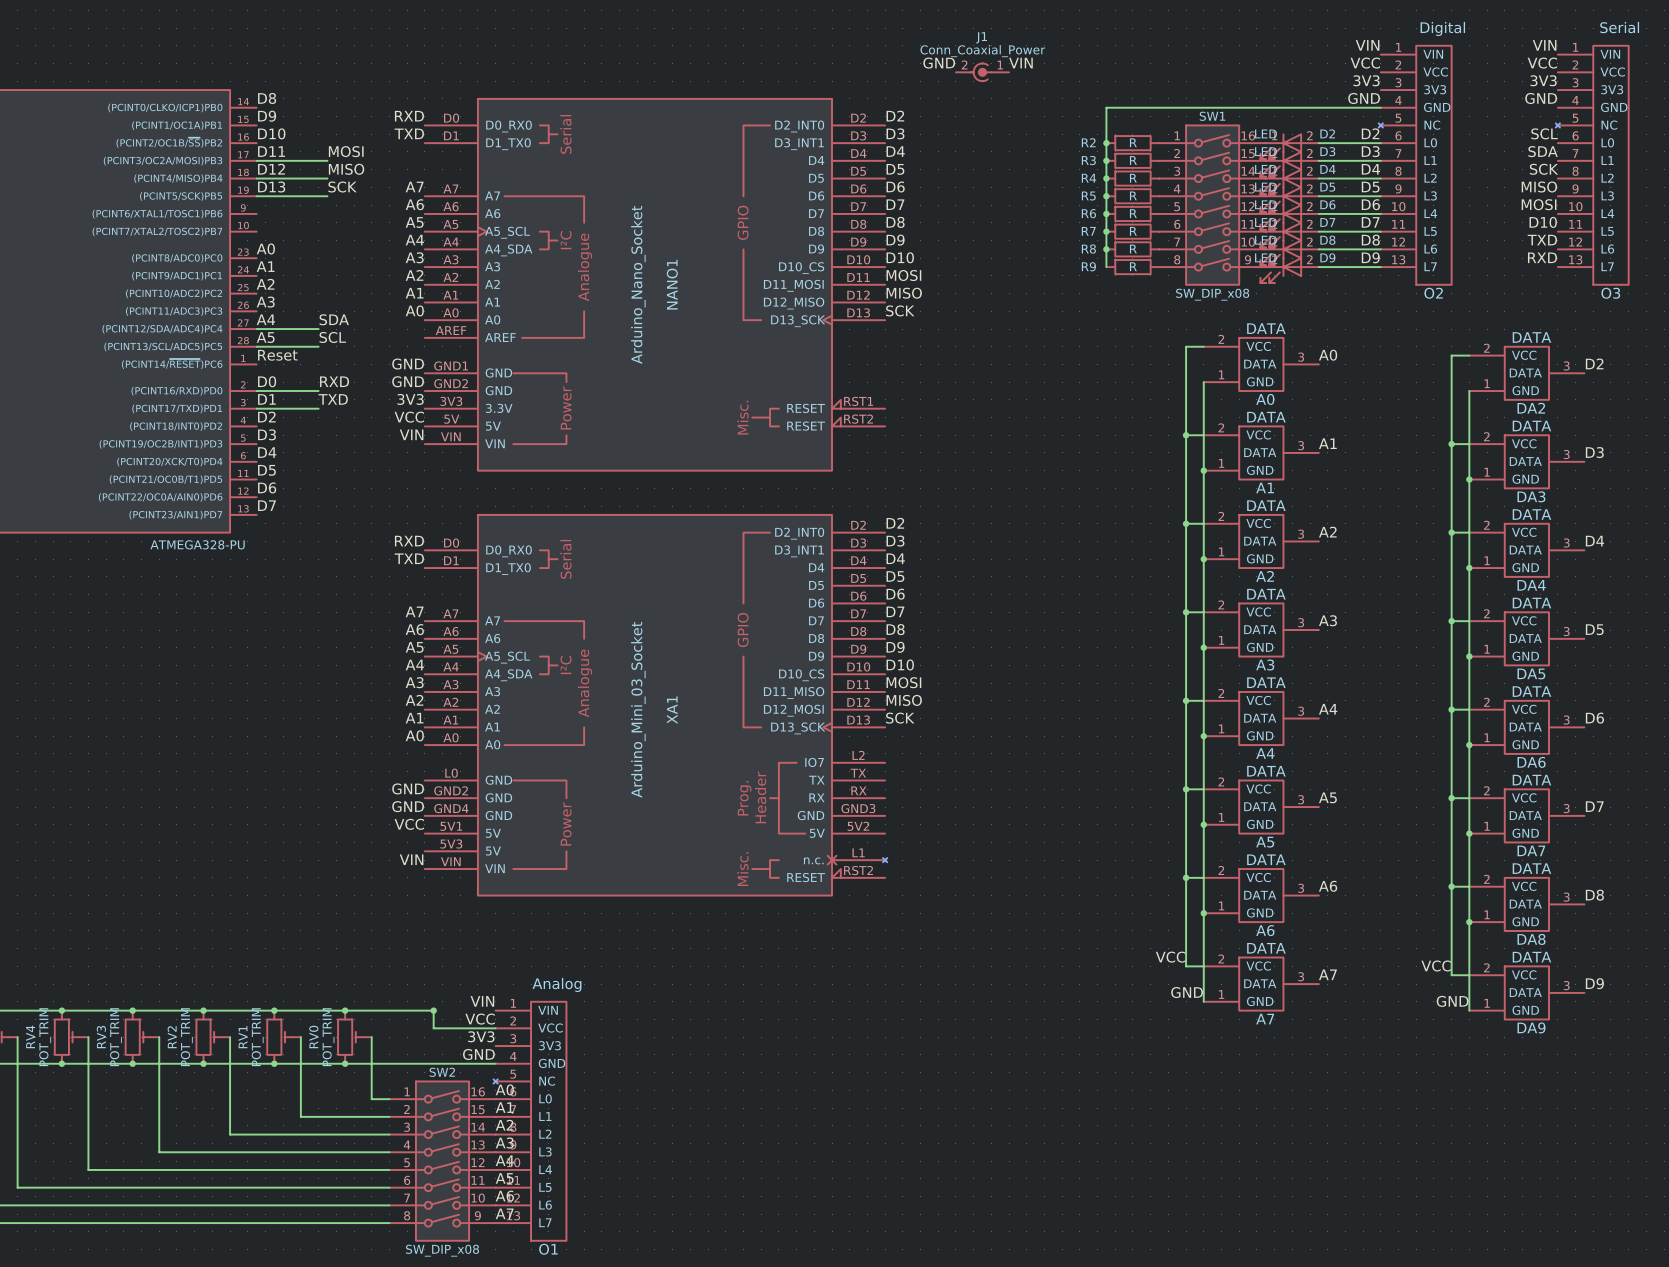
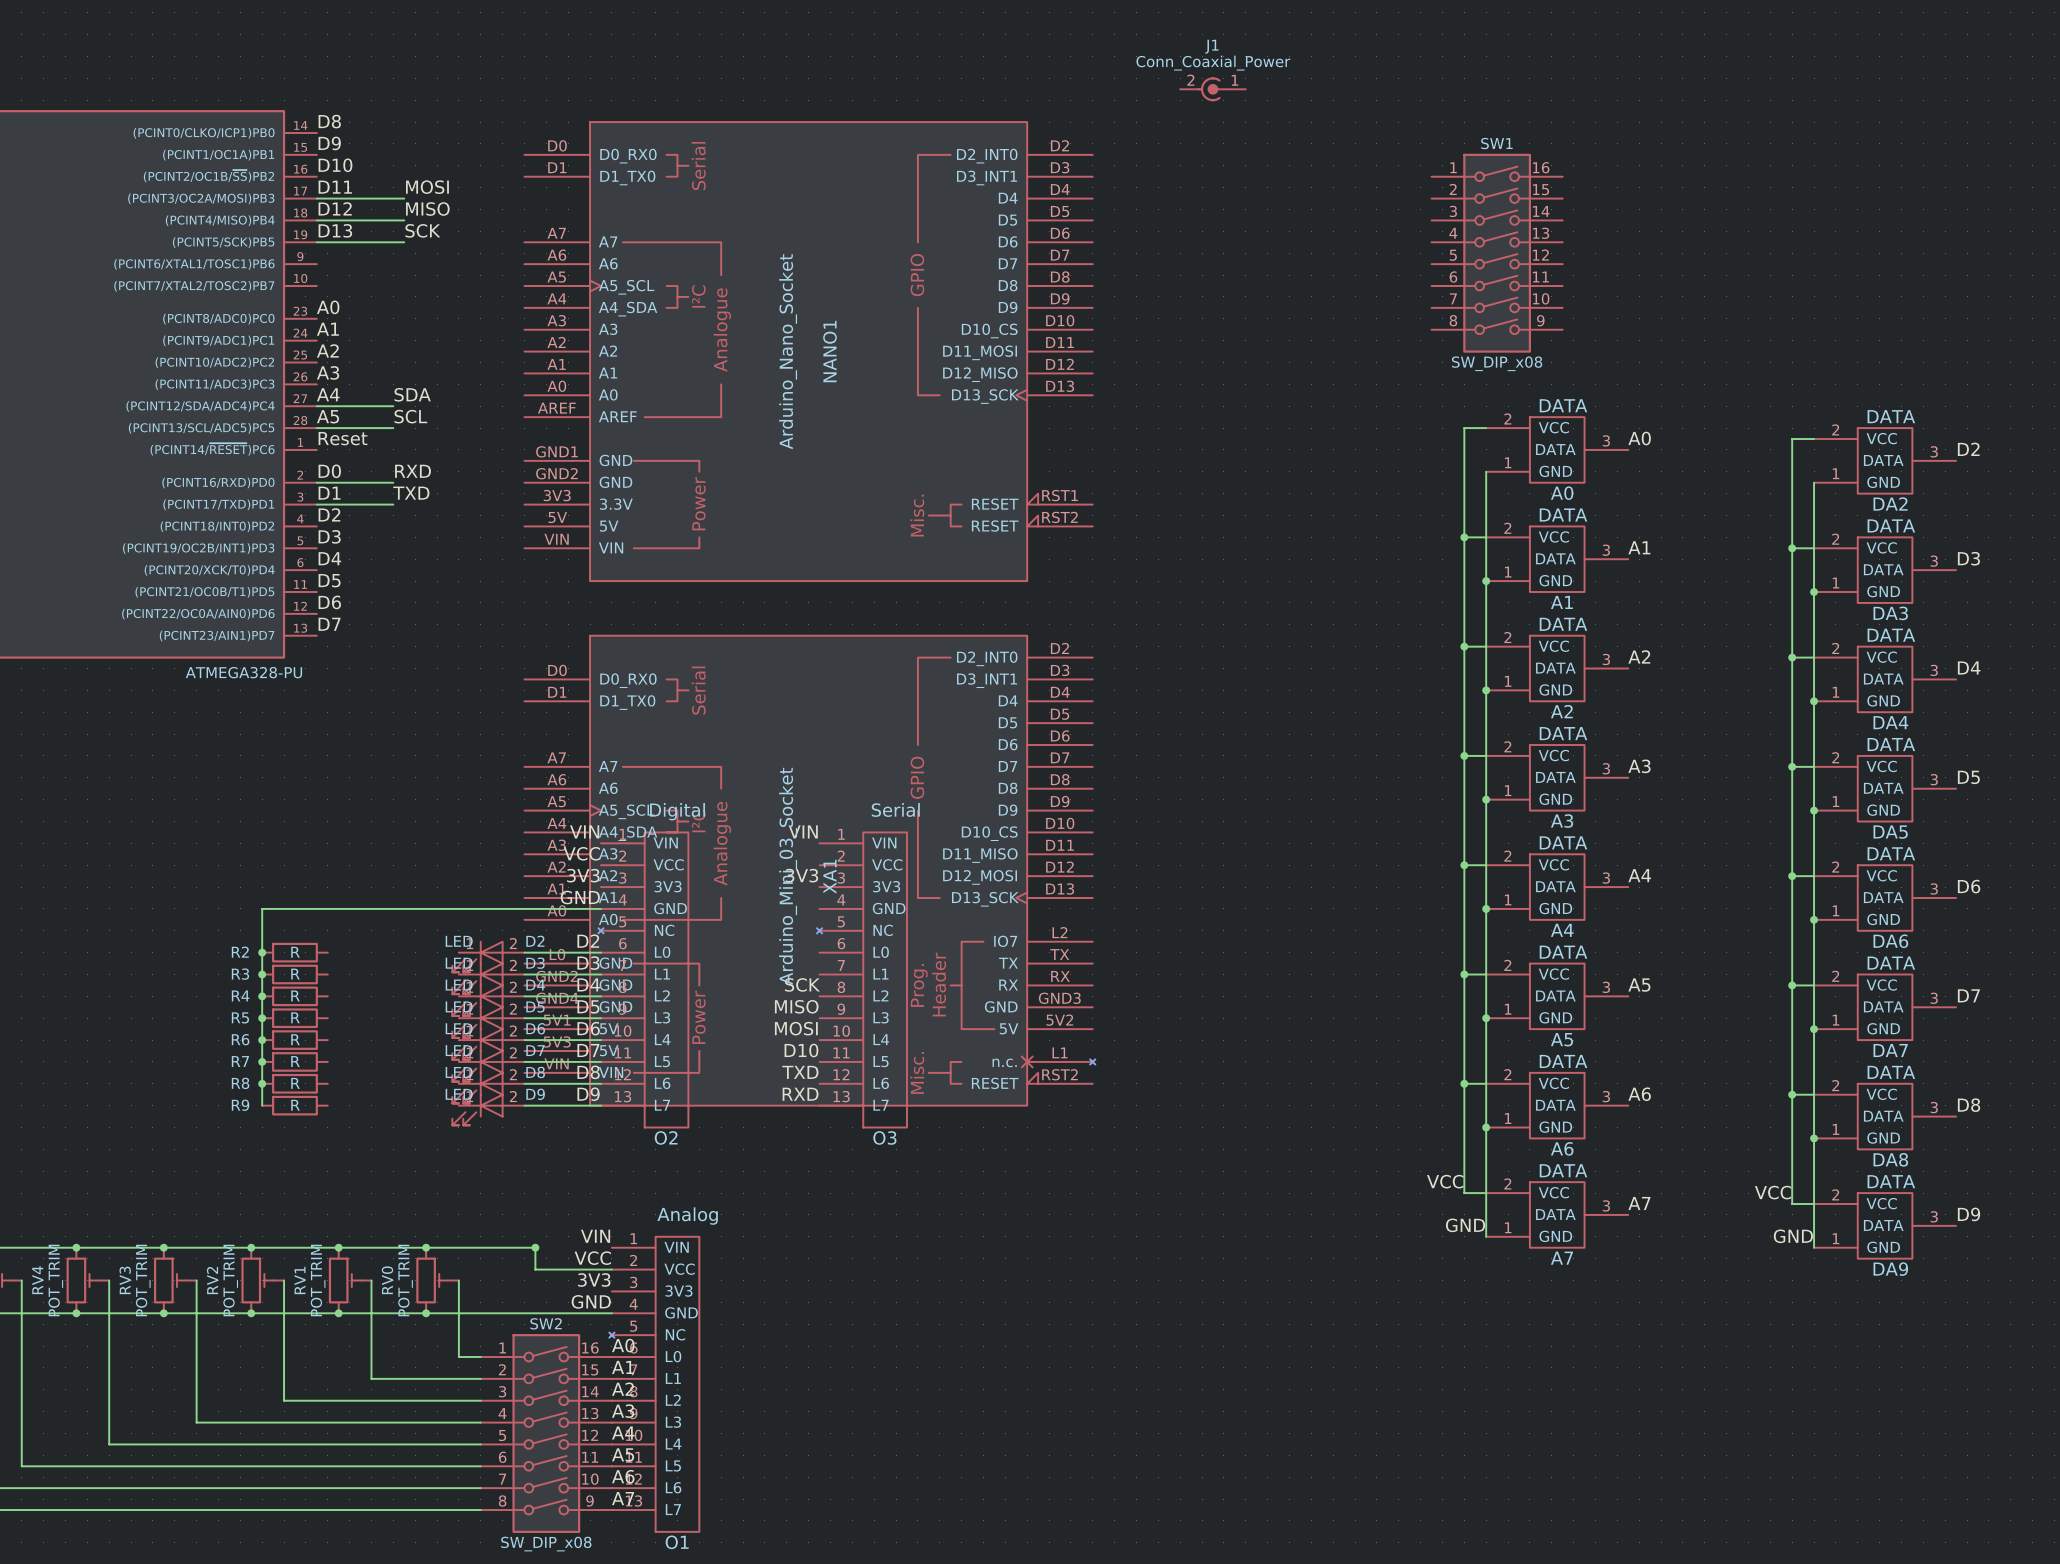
label: VIN (1367, 45) -> none
label: VIN (1544, 45) -> none
label: GND (939, 63) -> none
label: VIN (1020, 63) -> none
label: VCC (1365, 63) -> none
label: VCC (1542, 63) -> none
label: 3V3 (1366, 80) -> none
label: 3V3 (1543, 80) -> none
label: GND (1364, 98) -> none
label: GND (1541, 98) -> none
wire: (1380, 107) (1106, 107) (1106, 267) -> none
label: RXD (409, 116) -> none
label: D2 (895, 116) -> none
label: TXD (409, 133) -> none
label: D3 (895, 133) -> none
label: D2 (1370, 133) -> none
label: SCL (1544, 133) -> none
junction: (1106, 143) -> none
R2 position: (1132, 143) -> (294, 952)
wire: (1318, 143) (1380, 143) -> none
D2 position: (1289, 146) -> (488, 956)
label: D4 (895, 151) -> none
label: D3 (1370, 151) -> none
label: SDA (1543, 151) -> none
junction: (1106, 160) -> none
R3 position: (1132, 160) -> (294, 974)
wire: (1318, 160) (1380, 160) -> none
D3 position: (1289, 164) -> (488, 978)
O2 position: (1415, 165) -> (643, 979)
O3 position: (1592, 165) -> (861, 979)
label: D5 (895, 169) -> none
label: D4 (1370, 169) -> none
label: SCK (1544, 169) -> none
junction: (1106, 178) -> none
R4 position: (1132, 178) -> (294, 996)
wire: (1318, 178) (1380, 178) -> none
D4 position: (1289, 181) -> (488, 1000)
label: A7 (414, 186) -> none
label: D6 (895, 187) -> none
label: D5 (1370, 187) -> none
label: MISO (1539, 187) -> none
junction: (1106, 196) -> none
R5 position: (1132, 196) -> (294, 1018)
wire: (1318, 196) (1380, 196) -> none
D5 position: (1289, 199) -> (488, 1022)
label: A6 (414, 204) -> none
label: D7 (895, 204) -> none
label: D6 (1370, 204) -> none
label: MOSI (1539, 204) -> none
junction: (1106, 213) -> none
R6 position: (1132, 213) -> (294, 1040)
wire: (1318, 213) (1380, 213) -> none
D6 position: (1289, 217) -> (488, 1044)
label: A5 (414, 222) -> none
label: D8 (895, 222) -> none
label: D7 (1370, 222) -> none
label: D10 (1543, 222) -> none
junction: (1106, 231) -> none
R7 position: (1132, 231) -> (294, 1061)
wire: (1318, 231) (1380, 231) -> none
D7 position: (1289, 234) -> (488, 1065)
label: A4 (414, 240) -> none
label: D9 (895, 240) -> none
label: D8 (1370, 240) -> none
label: TXD (1542, 240) -> none
junction: (1106, 249) -> none
R8 position: (1132, 249) -> (294, 1083)
wire: (1318, 249) (1380, 249) -> none
D8 position: (1289, 252) -> (488, 1087)
label: A3 (414, 257) -> none
label: D10 (900, 257) -> none
label: D9 (1370, 257) -> none
label: RXD (1542, 257) -> none
R9 position: (1132, 267) -> (294, 1105)
wire: (1318, 267) (1380, 267) -> none
D9 position: (1289, 270) -> (488, 1109)
label: A2 (414, 275) -> none
label: MOSI (903, 275) -> none
label: A1 (414, 293) -> none
label: MISO (904, 293) -> none
label: A0 (414, 310) -> none
label: SCK (900, 310) -> none
label: GND (408, 364) -> none
label: GND (408, 381) -> none
label: 3V3 (410, 399) -> none
label: VCC (409, 417) -> none
label: VIN (411, 434) -> none
label: D2 (895, 523) -> none
label: RXD (409, 541) -> none
label: D3 (895, 541) -> none
label: TXD (409, 558) -> none
label: D4 (895, 558) -> none
label: D5 (895, 576) -> none
label: D6 (895, 594) -> none
label: A7 (414, 611) -> none
label: D7 (895, 611) -> none
label: A6 (414, 629) -> none
label: D8 (895, 629) -> none
label: A5 (414, 647) -> none
label: D9 (895, 647) -> none
label: A4 (414, 664) -> none
label: D10 (900, 665) -> none
label: none -> VIN (584, 831)
label: none -> VIN (803, 831)
label: A3 (414, 682) -> none
label: MOSI (903, 682) -> none
label: none -> VCC (581, 853)
label: A2 (414, 700) -> none
label: MISO (904, 700) -> none
label: none -> 3V3 (583, 875)
label: none -> 3V3 (801, 875)
label: A1 (414, 718) -> none
label: SCK (900, 718) -> none
label: none -> GND (580, 897)
label: A0 (414, 735) -> none
wire: none -> (600, 908) (262, 908) (262, 1105)
label: none -> D2 (588, 941)
junction: none -> (262, 952)
wire: none -> (524, 952) (600, 952)
label: none -> D3 (588, 963)
label: GND (408, 788) -> none
junction: none -> (262, 974)
wire: none -> (524, 974) (600, 974)
label: none -> D4 (588, 984)
label: none -> SCK (802, 984)
label: GND (408, 806) -> none
junction: none -> (262, 996)
wire: none -> (524, 996) (600, 996)
label: none -> D5 (588, 1006)
label: none -> MISO (796, 1006)
junction: none -> (262, 1018)
label: VCC (409, 824) -> none
wire: none -> (524, 1018) (600, 1018)
label: none -> D6 (588, 1028)
label: none -> MOSI (796, 1028)
junction: none -> (262, 1040)
wire: none -> (524, 1040) (600, 1040)
label: none -> D7 (588, 1050)
label: none -> D10 (801, 1050)
label: VIN (411, 859) -> none
junction: none -> (262, 1061)
wire: none -> (524, 1061) (600, 1061)
label: none -> D8 (588, 1072)
label: none -> TXD (800, 1072)
junction: none -> (262, 1083)
wire: none -> (524, 1083) (600, 1083)
label: none -> D9 (588, 1094)
label: none -> RXD (800, 1094)
wire: none -> (524, 1105) (600, 1105)

